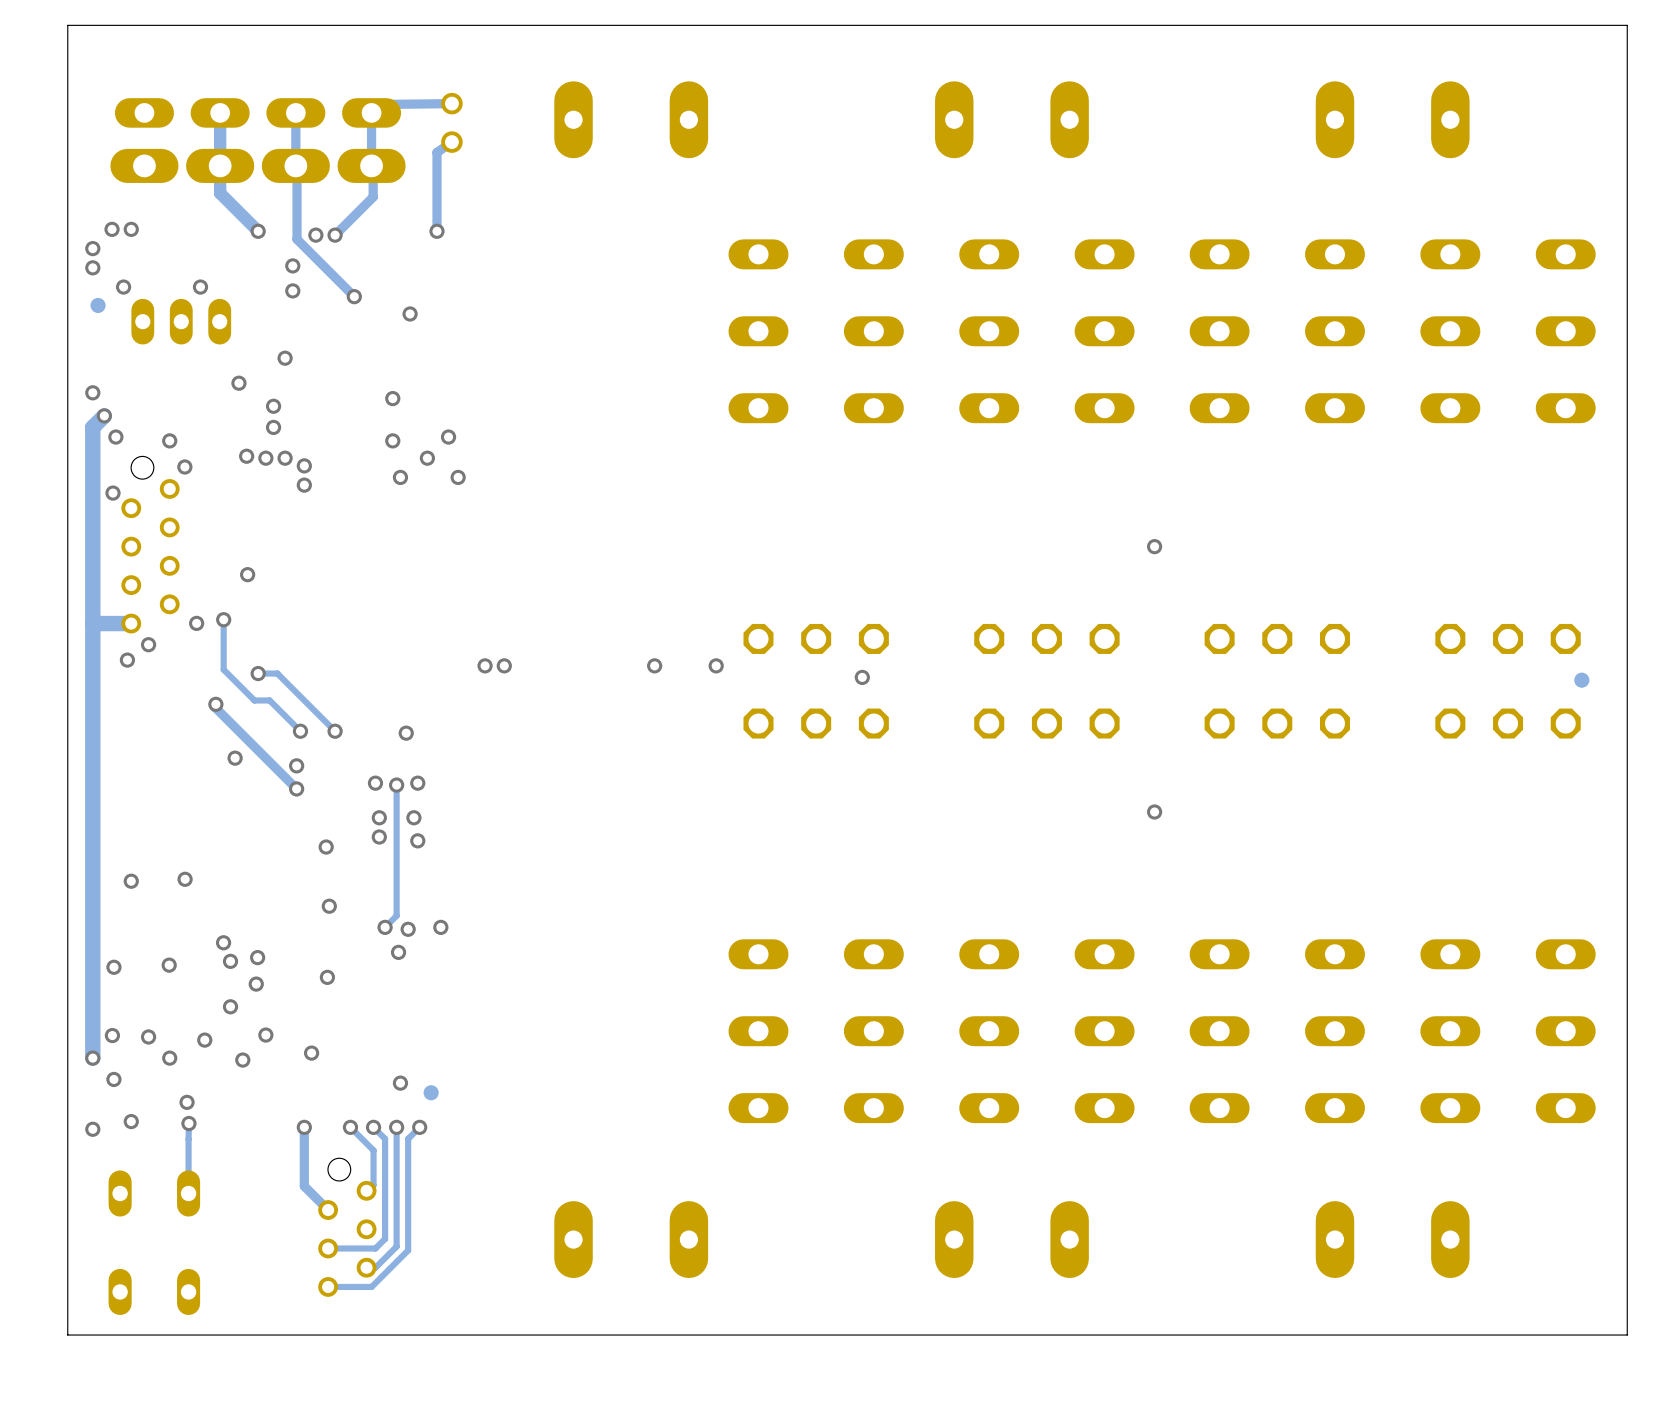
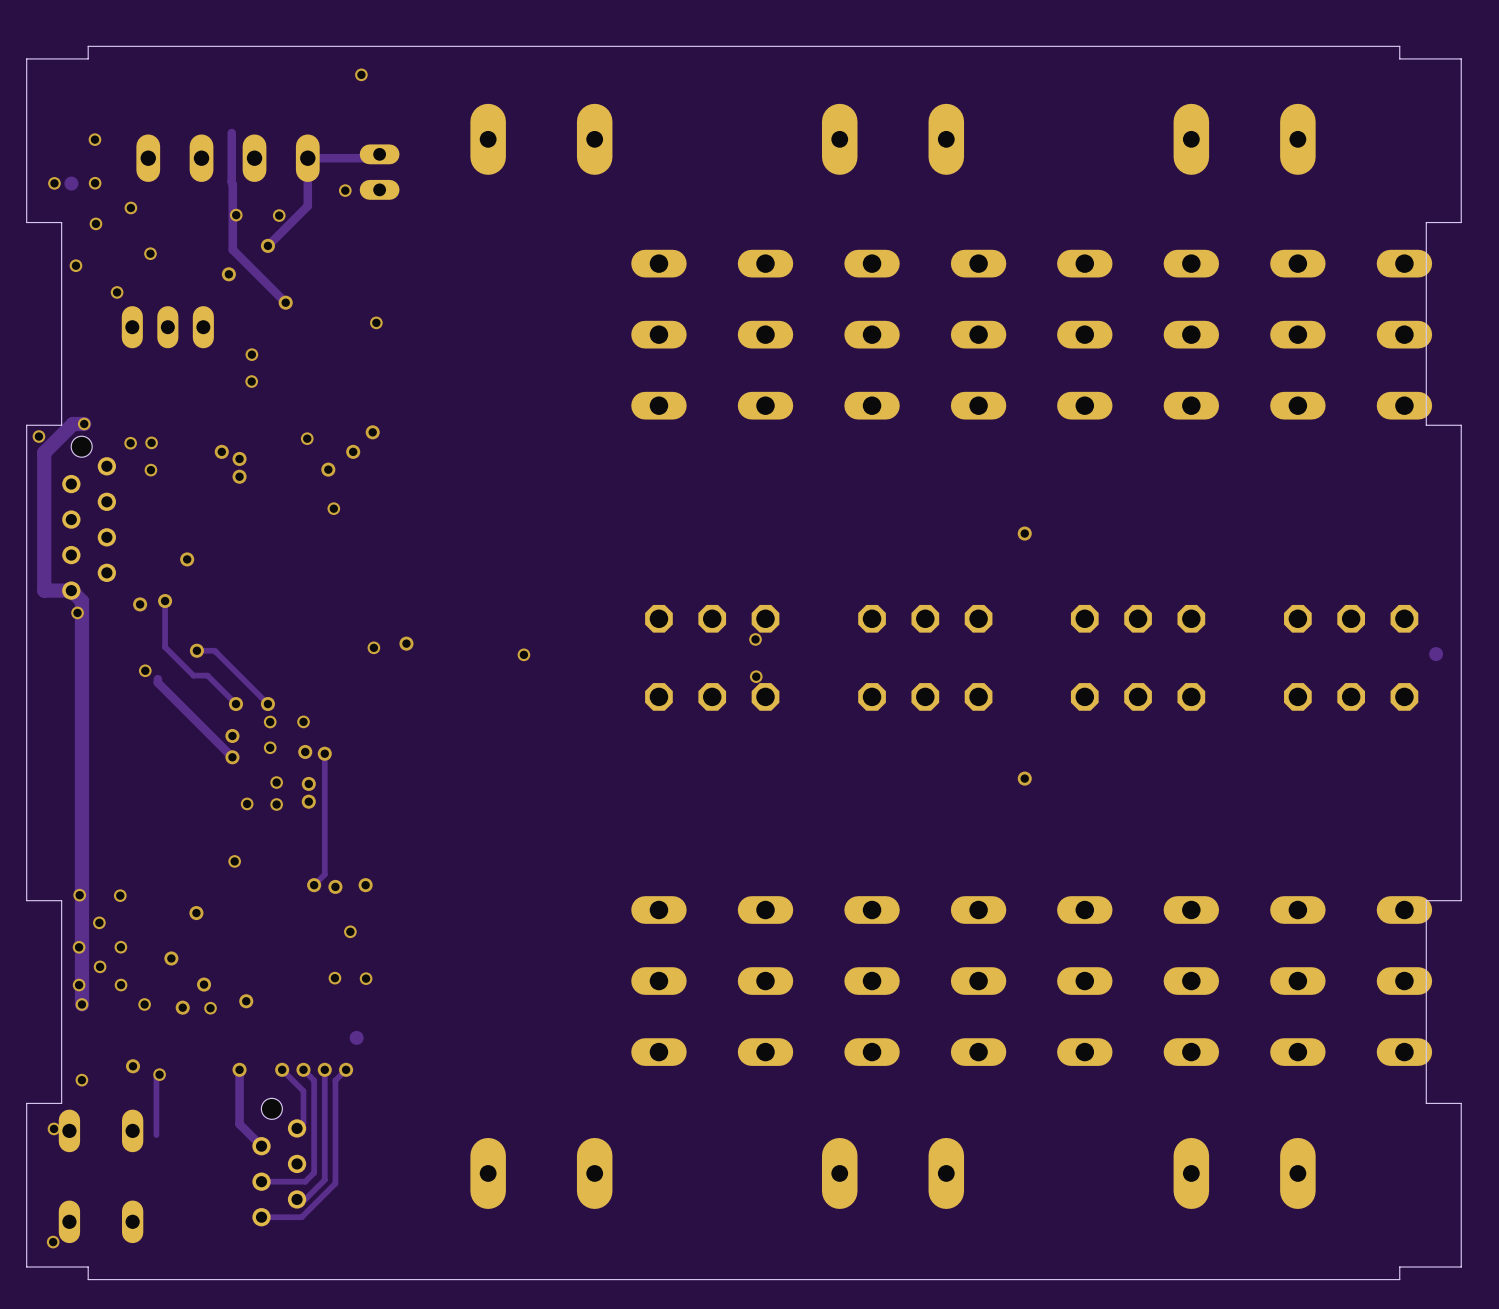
board edge: (1627, 32) (1627, 25) (67, 25) (67, 1335) (1627, 1335) -> (1461, 58) (1399, 58) (1399, 46) (88, 46) (88, 58) (26, 58) (26, 222) (61, 222) (61, 425) (26, 425) (26, 900) (61, 900) (61, 1103) (26, 1103) (26, 1267) (88, 1267) (88, 1279) (1399, 1279) (1399, 1267) (1461, 1267) (1461, 1261)
via: none -> (361, 74)
track: (451, 103) (388, 104) (378, 114) (371, 112) (373, 197) -> (307, 158) (307, 206) (303, 210)
track: (220, 112) (220, 193) (258, 231) -> none
via: none -> (94, 139)
part: (451, 122) -> none
track: none -> (379, 154) (379, 158) (307, 158)
part: none -> (174, 158)
part: (258, 140) -> none
part: none -> (281, 158)
track: (451, 142) (437, 152) (437, 231) -> none
part: none -> (379, 172)
via: none -> (54, 183)
via: none -> (95, 183)
via: none -> (345, 190)
via: none -> (130, 207)
via: none -> (236, 215)
via: none -> (279, 215)
board edge: (1627, 209) (1627, 429) -> (1461, 222) (1426, 222) (1426, 425) (1461, 425)
via: none -> (95, 223)
via: (112, 229) -> none
via: (131, 229) -> none
via: (258, 231) -> none
via: (437, 231) -> none
via: (315, 235) -> none
via: none -> (150, 253)
via: (92, 248) -> none
via: none -> (75, 265)
via: (92, 267) -> none
via: none -> (117, 292)
via: (123, 287) -> none
via: (200, 287) -> none
via: (292, 290) -> none
drawing position: (98, 305) -> (71, 183)
via: (410, 313) -> none
via: none -> (376, 322)
part position: (181, 321) -> (167, 327)
via: none -> (251, 354)
via: (285, 358) -> none
via: none -> (251, 381)
via: (238, 383) -> none
via: (92, 392) -> none
via: (392, 398) -> none
via: (273, 406) -> none
track: (104, 415) (92, 427) (92, 459) -> (84, 423) (73, 423) (44, 452)
via: (104, 415) -> none
via: (273, 427) -> none
via: none -> (84, 423)
via: (115, 437) -> none
via: (169, 440) -> none
via: (392, 440) -> none
via: none -> (38, 436)
via: none -> (307, 438)
via: none -> (130, 443)
via: none -> (151, 442)
via: (246, 456) -> none
via: (265, 458) -> none
via: (184, 466) -> none
via: none -> (150, 470)
via: (458, 477) -> none
via: (112, 493) -> none
via: none -> (333, 508)
part position: (150, 544) -> (89, 517)
track: (92, 608) (92, 1058) -> (44, 590) (71, 590) (81, 601) (81, 1004)
track: (131, 623) (92, 623) -> none
via: none -> (77, 612)
via: (148, 644) -> none
via: (127, 660) -> none
via: none -> (755, 639)
via: (504, 665) -> none
via: (654, 665) -> none
via: (716, 665) -> none
via: none -> (373, 647)
via: none -> (523, 654)
via: (862, 677) -> none
drawing position: (1581, 680) -> (1436, 654)
via: none -> (145, 670)
via: none -> (756, 676)
via: (215, 704) -> none
via: (406, 733) -> none
via: none -> (270, 722)
via: none -> (303, 721)
via: (235, 758) -> none
via: none -> (270, 747)
via: (417, 783) -> none
via: none -> (276, 782)
via: (413, 817) -> none
via: none -> (247, 803)
via: none -> (276, 804)
via: (417, 840) -> none
via: (326, 847) -> none
via: (185, 879) -> none
via: (131, 881) -> none
via: none -> (234, 861)
via: (329, 906) -> none
via: none -> (79, 895)
via: none -> (120, 895)
via: (223, 942) -> none
board edge: (1627, 944) (1627, 1163) -> (1461, 900) (1426, 900) (1426, 1103) (1461, 1103)
via: (398, 952) -> none
via: (230, 961) -> none
via: (169, 965) -> none
via: (113, 967) -> none
via: none -> (99, 922)
via: (327, 977) -> none
via: none -> (350, 931)
via: (256, 984) -> none
via: none -> (79, 947)
via: none -> (120, 947)
via: none -> (100, 966)
via: none -> (334, 978)
via: none -> (366, 978)
via: (112, 1035) -> none
via: none -> (79, 985)
via: none -> (121, 985)
via: (148, 1036) -> none
via: (204, 1040) -> none
via: none -> (81, 1004)
via: none -> (144, 1004)
via: (92, 1058) -> none
via: (169, 1058) -> none
via: none -> (210, 1008)
via: (113, 1079) -> none
via: (400, 1083) -> none
via: (187, 1102) -> none
via: (131, 1121) -> none
track: (188, 1123) (188, 1193) -> none
via: (92, 1129) -> none
track: none -> (159, 1074) (156, 1077) (156, 1135)
via: none -> (159, 1074)
via: none -> (81, 1080)
via: none -> (54, 1128)
via: none -> (53, 1242)

